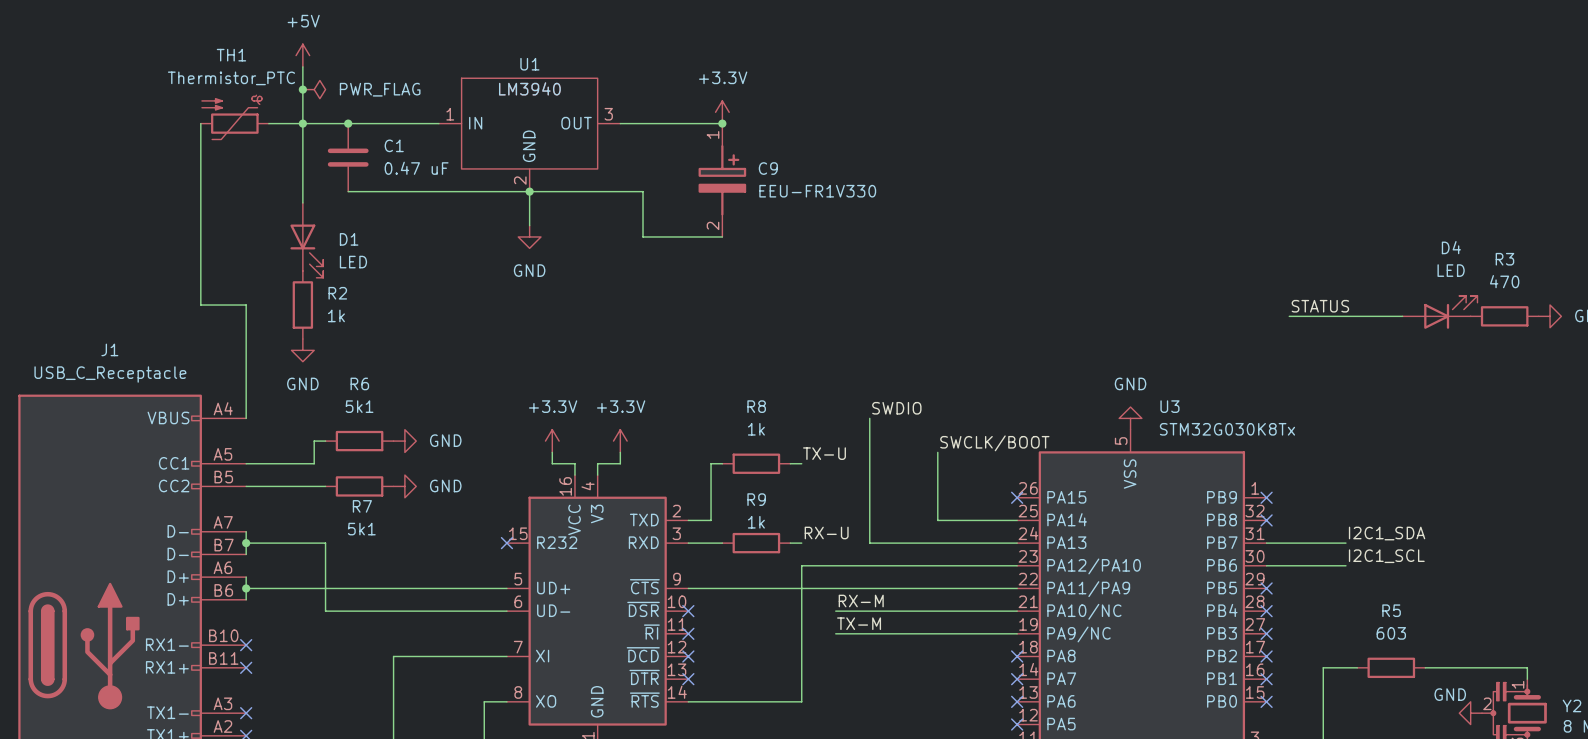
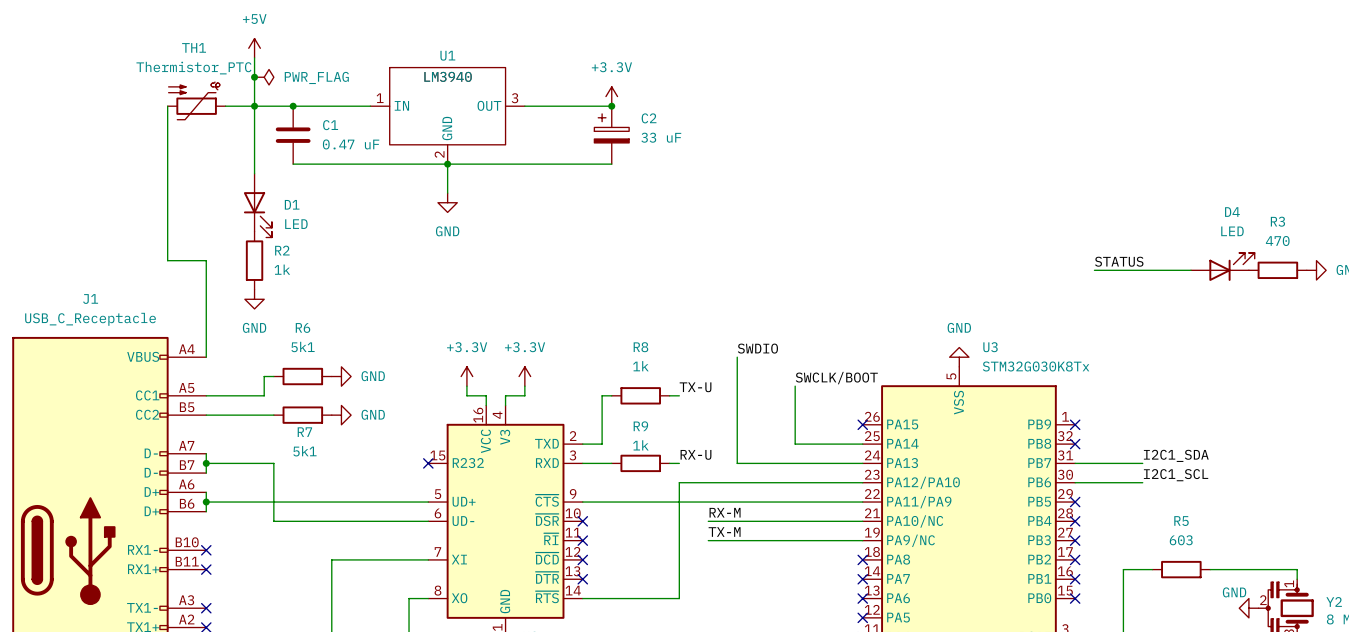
C2: none -> 33 uF (611, 135)
C9: EEU-FR1V330 (722, 180) -> none
wire: (643, 191) (643, 236) (722, 236) -> (544, 164) (611, 164)

